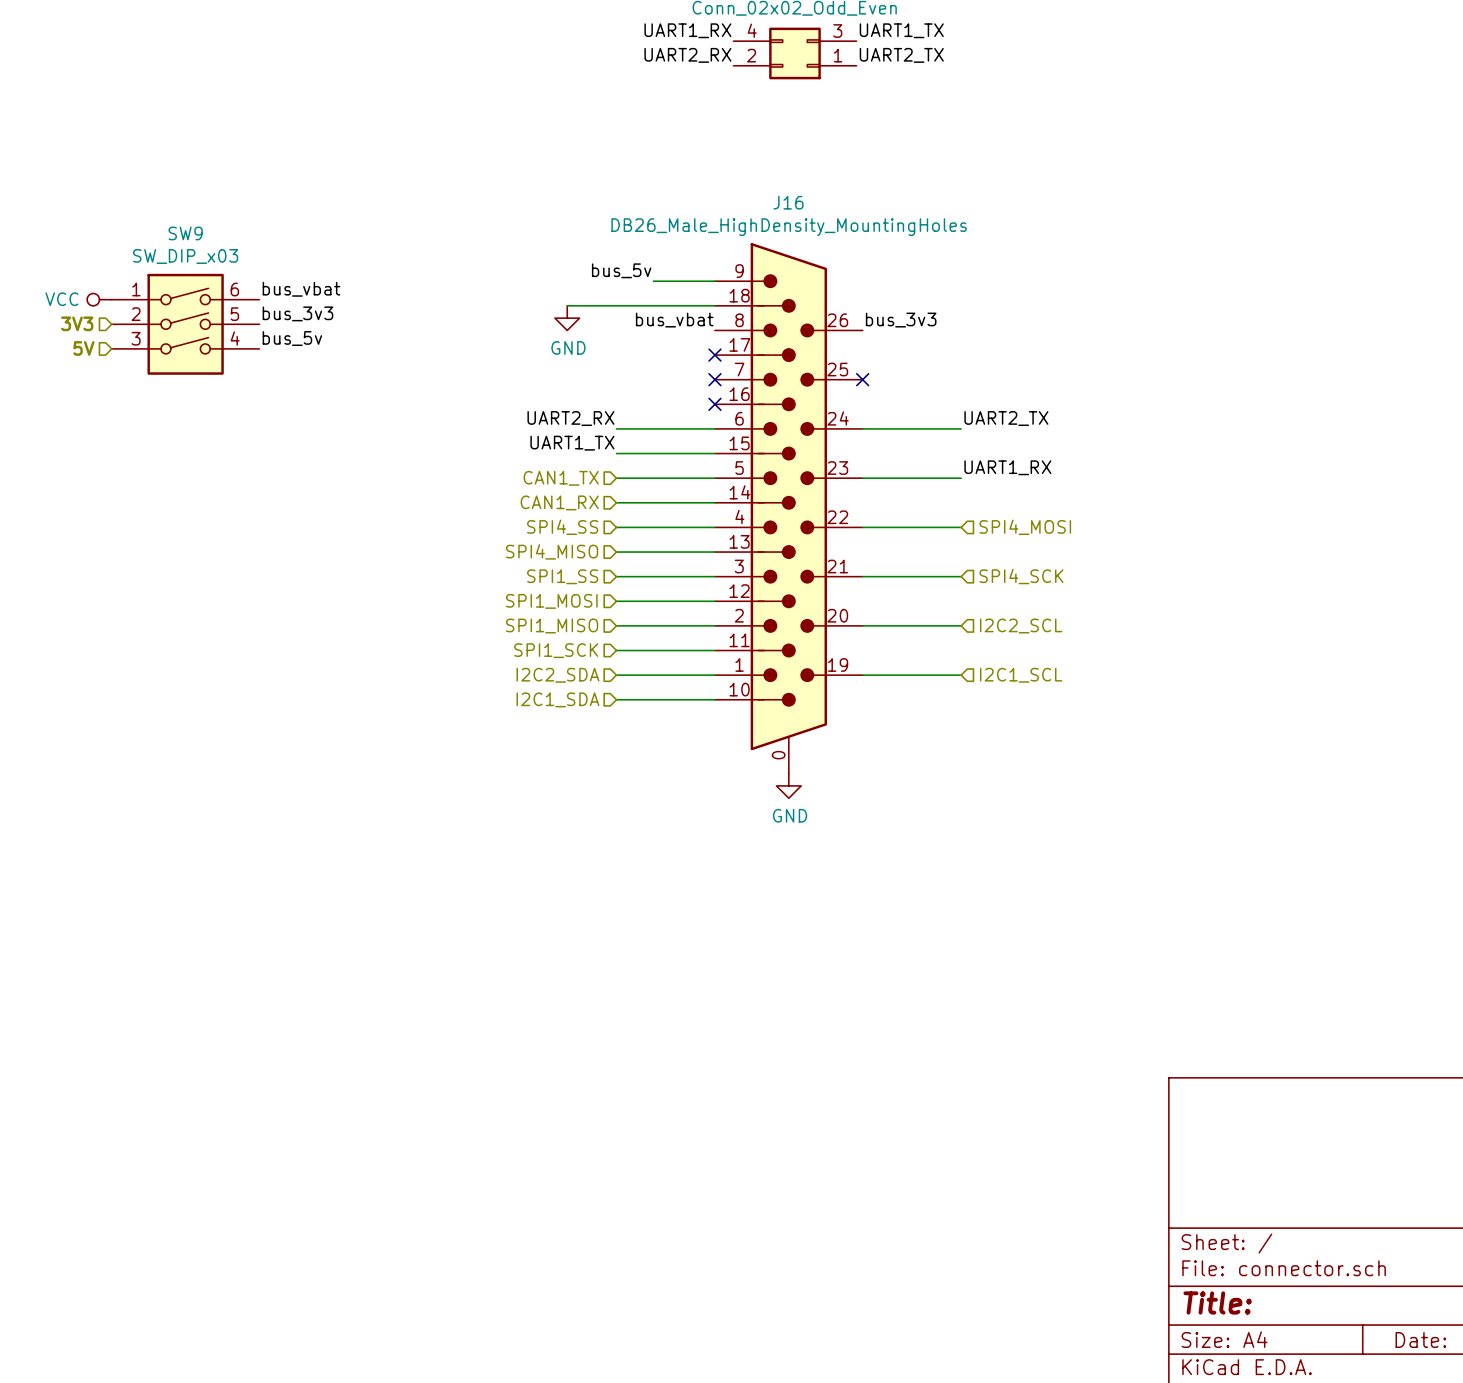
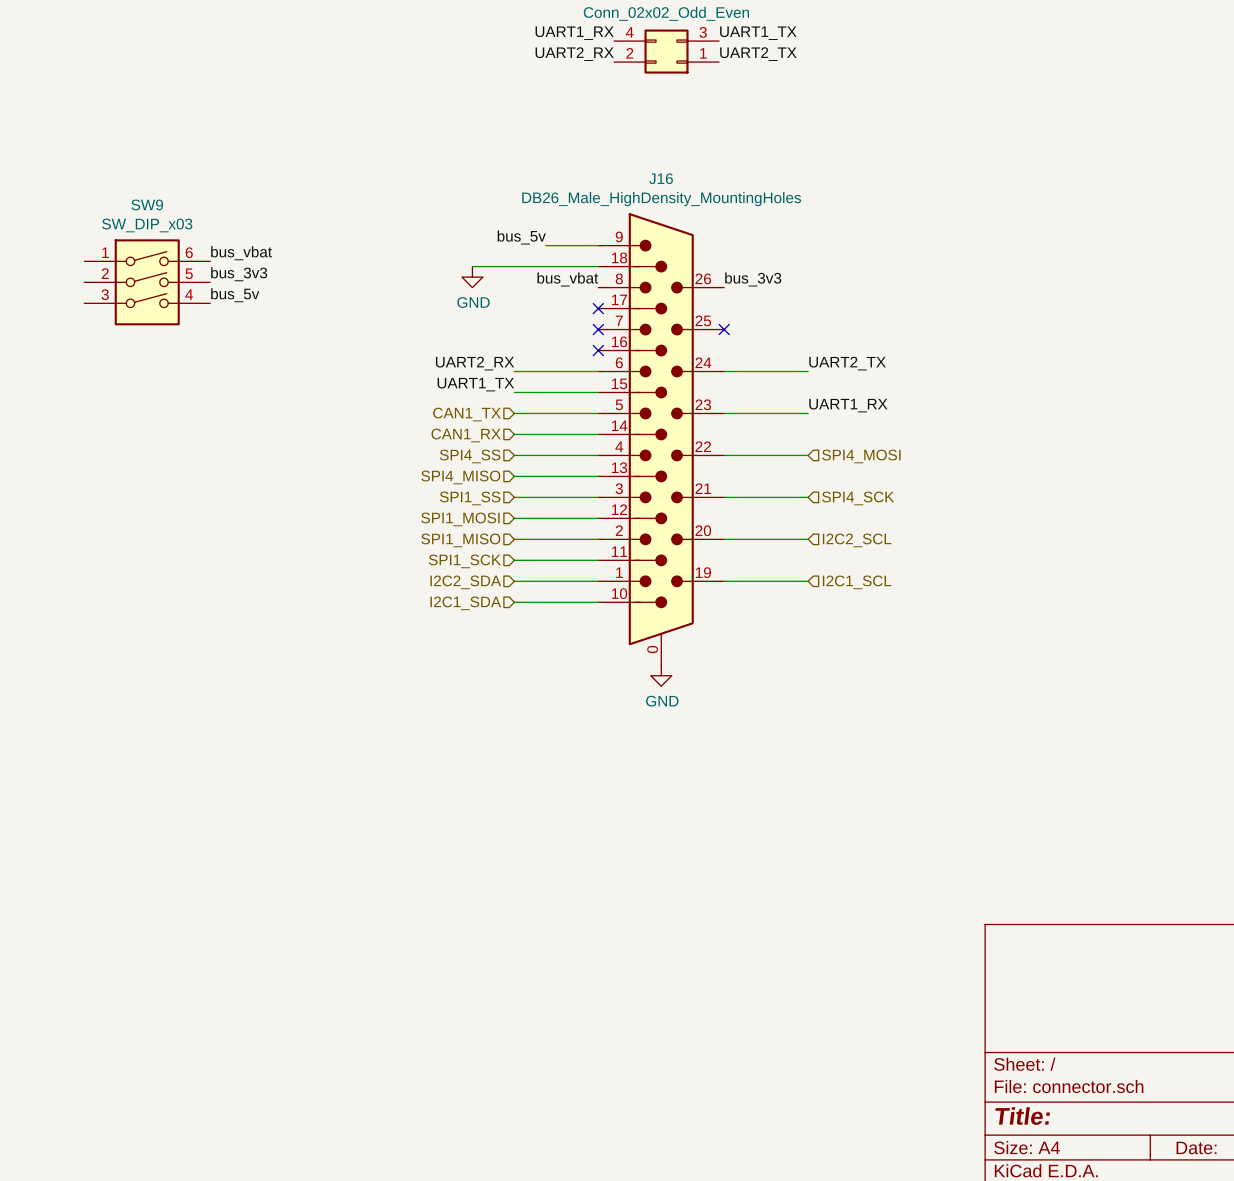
power symbol: VCC (99, 299) -> none
hierarchical label: 3V3 (77, 323) -> none
hierarchical label: 5V (83, 348) -> none

